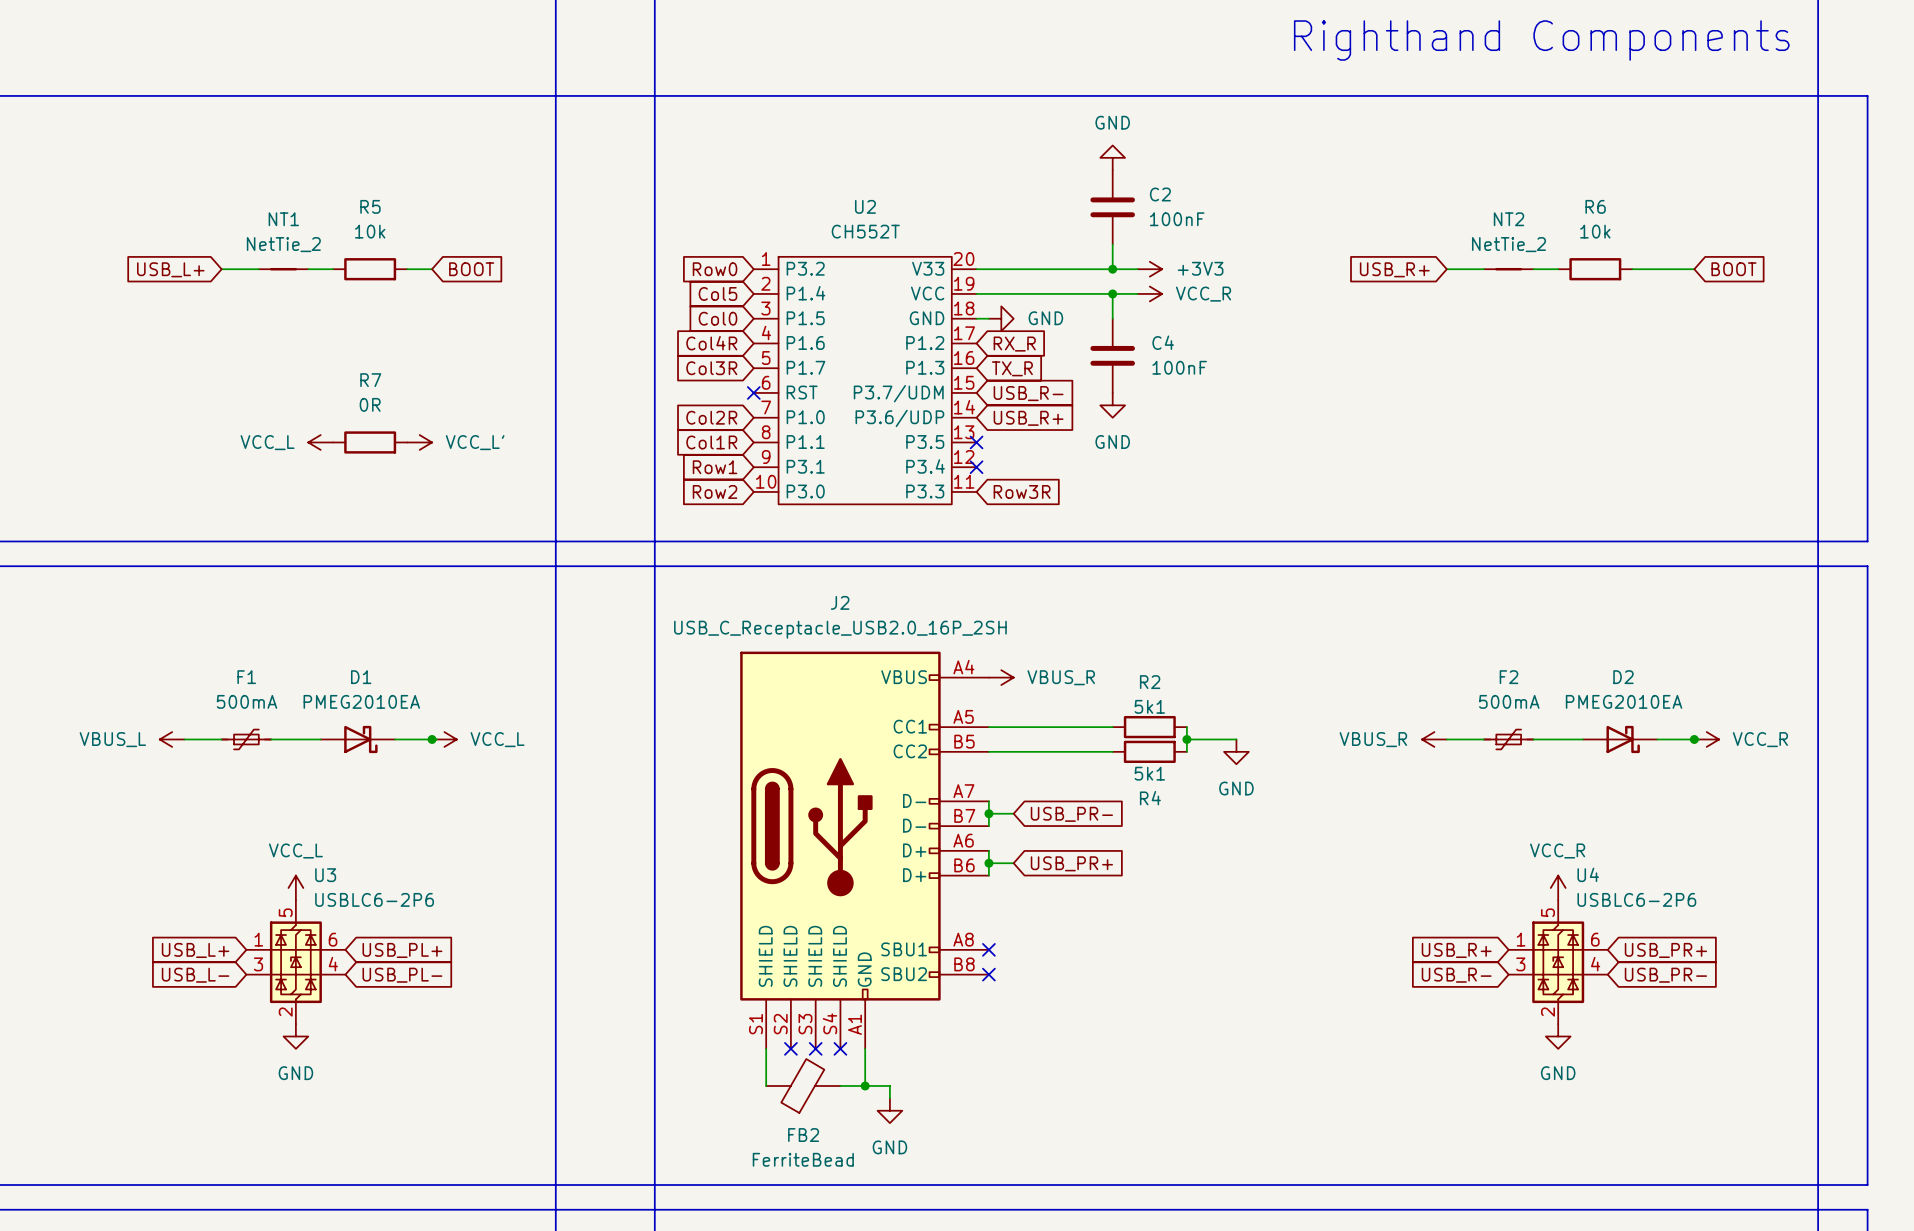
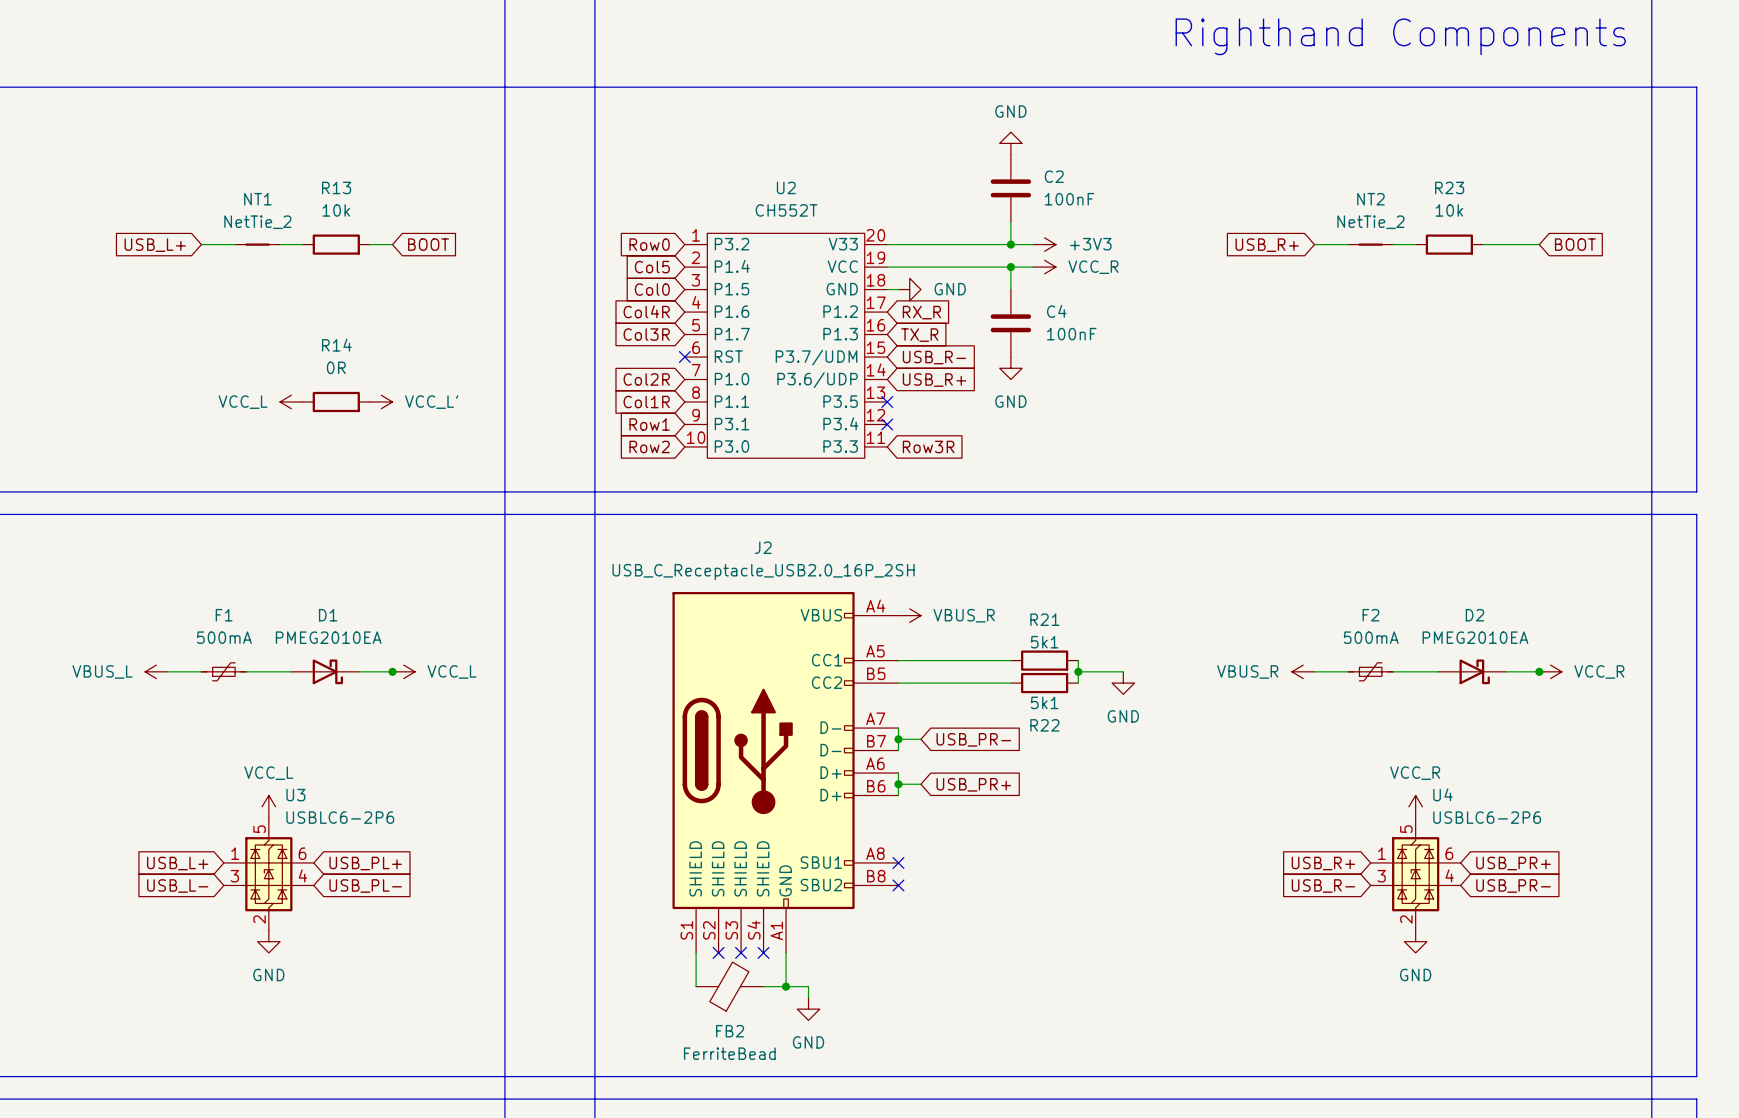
R5 name: R5 (370, 206) -> R13 (336, 187)
R6 name: R6 (1595, 206) -> R23 (1449, 187)
R7 name: R7 (370, 380) -> R14 (336, 345)
R2 name: R2 (1150, 682) -> R21 (1044, 619)
R4 name: R4 (1150, 798) -> R22 (1044, 725)

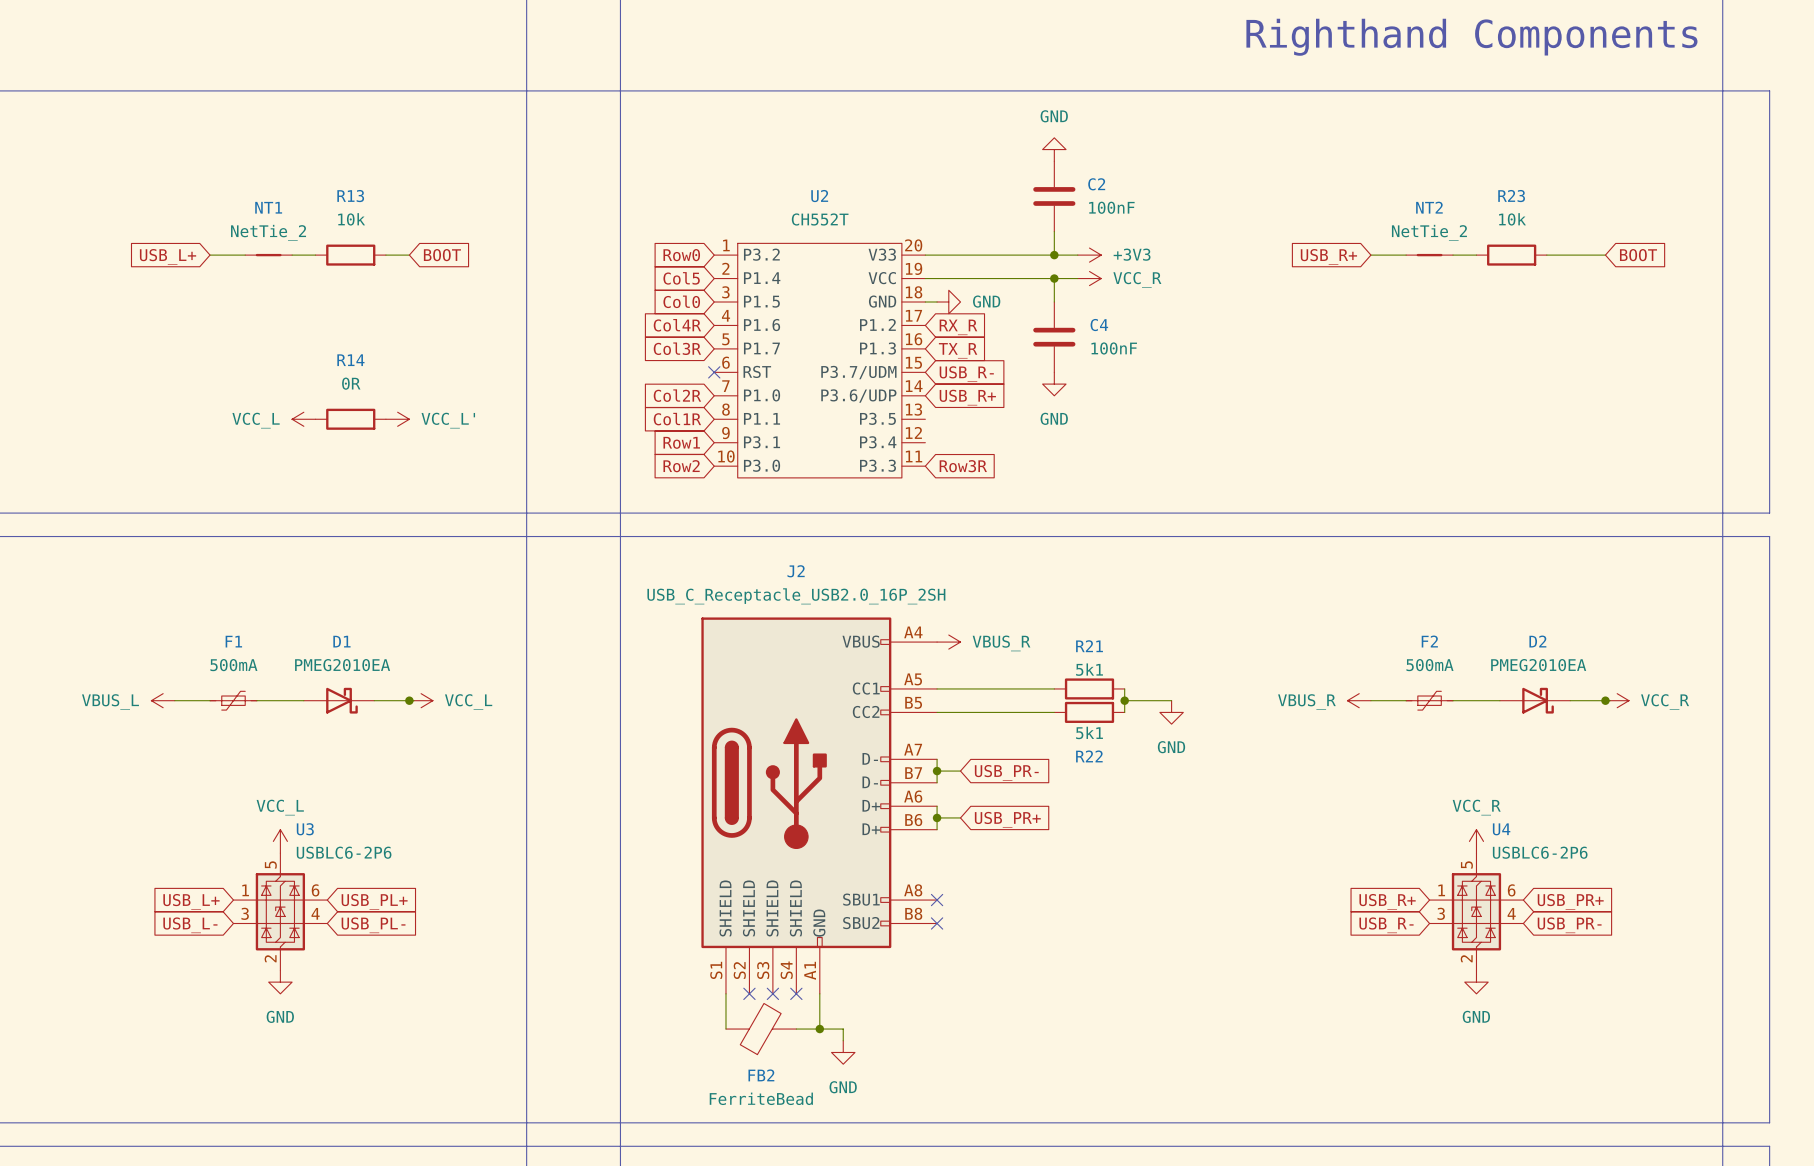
no-connect mark: (887, 401) -> none
no-connect mark: (887, 424) -> none

